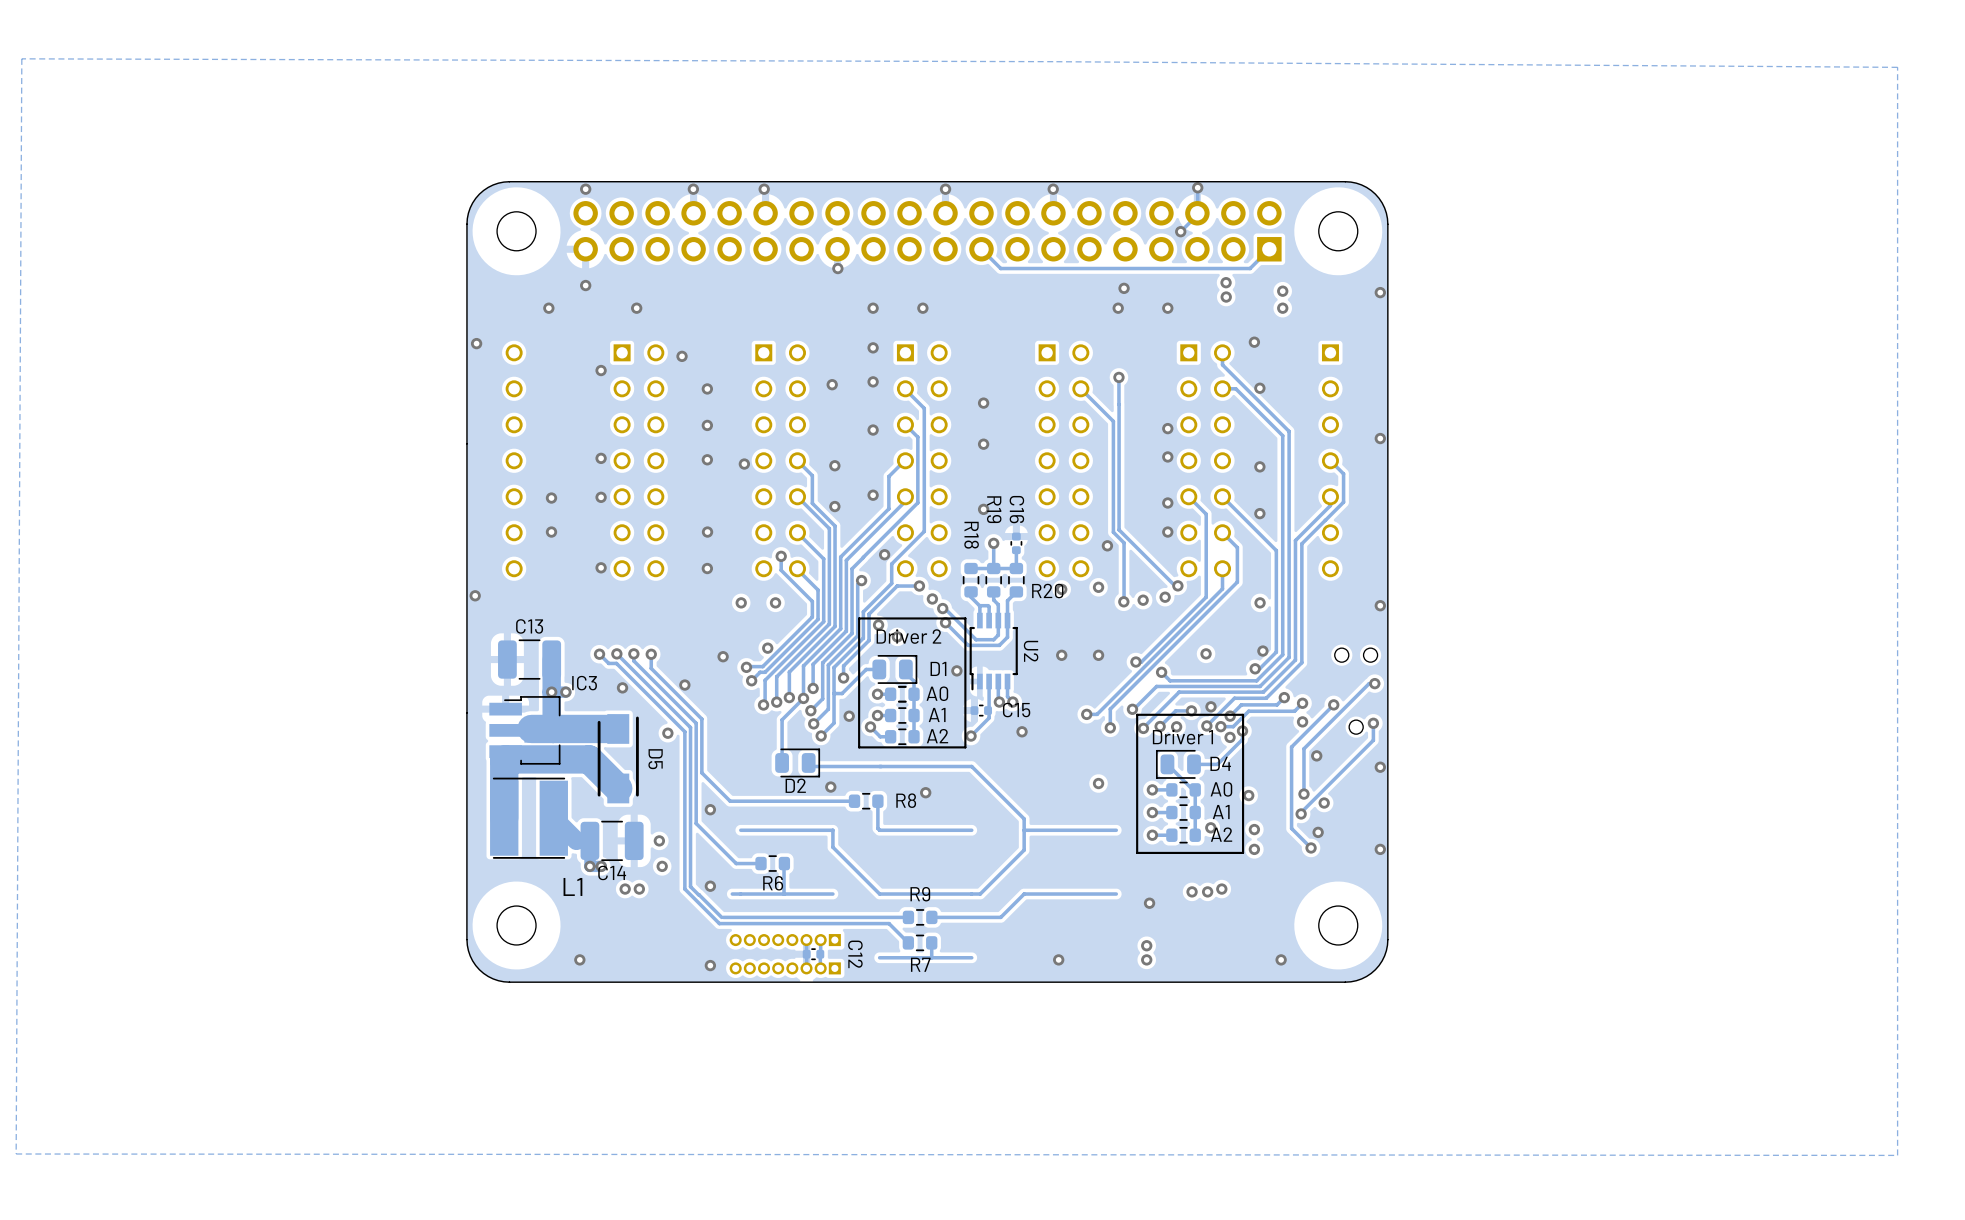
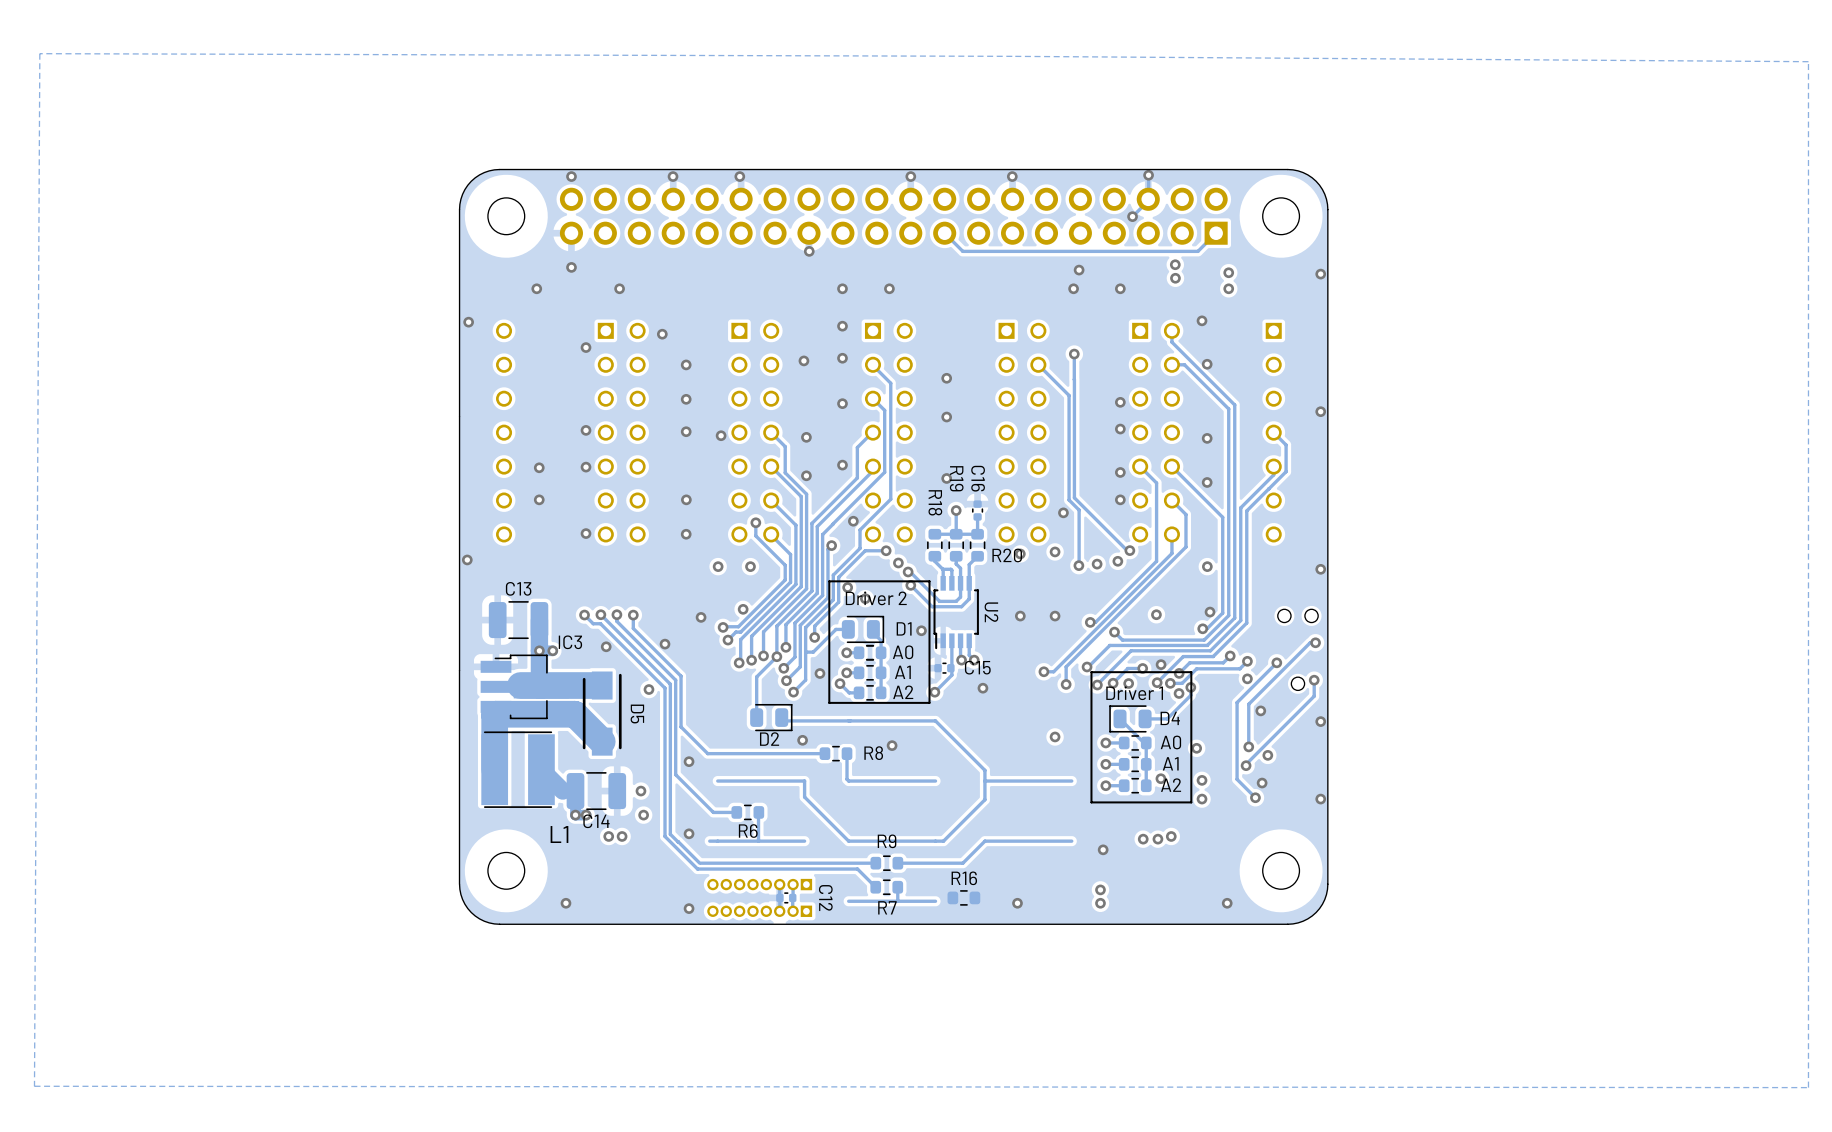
R16: none -> (963, 897)

